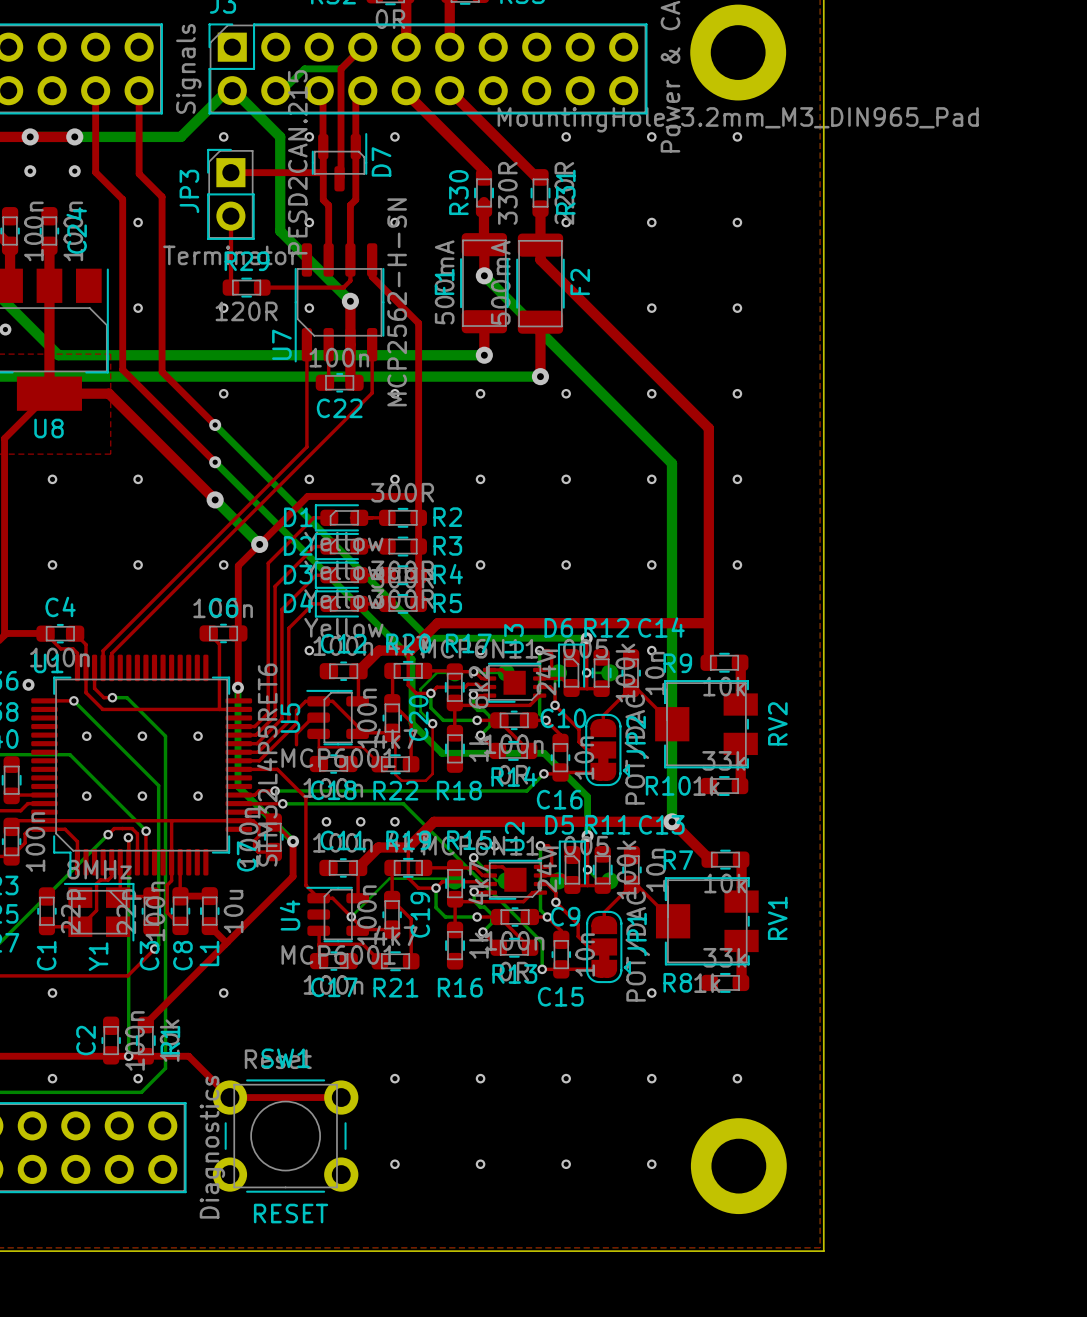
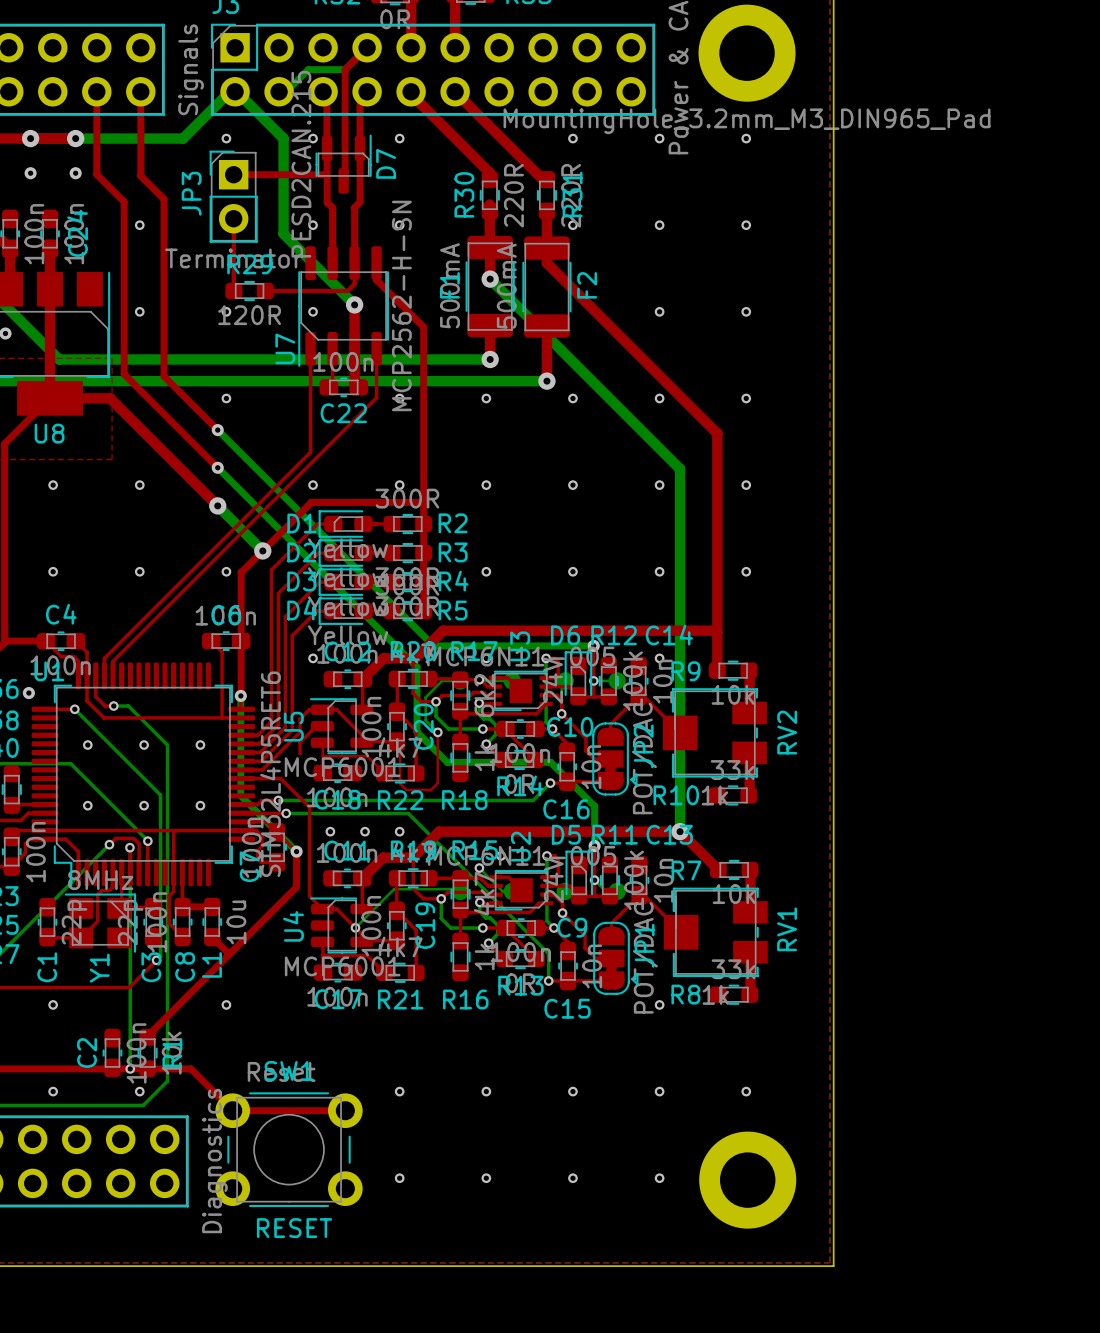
R30 value: 330R (507, 193) -> 220R (513, 195)

